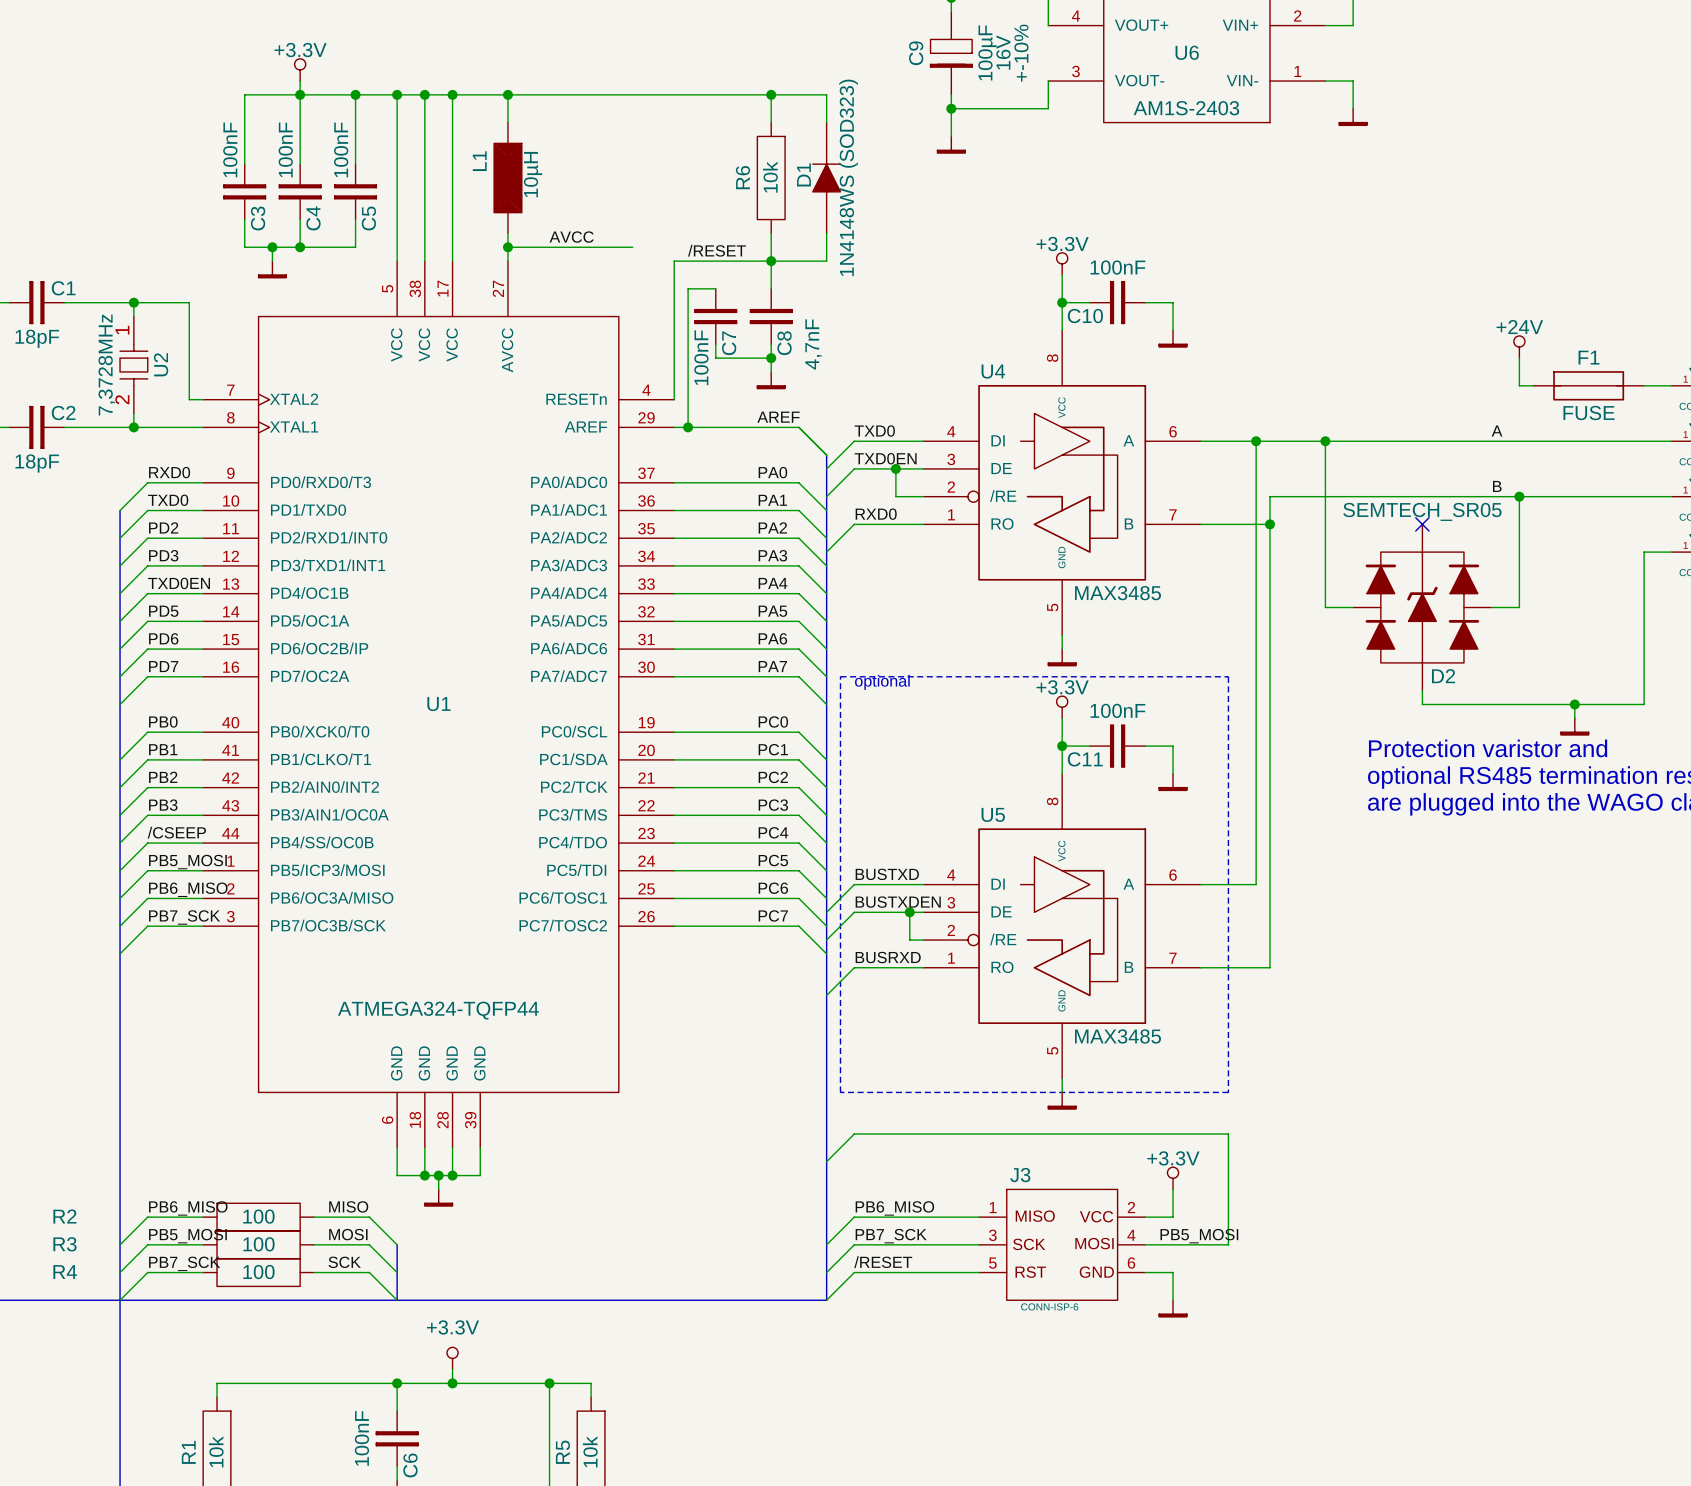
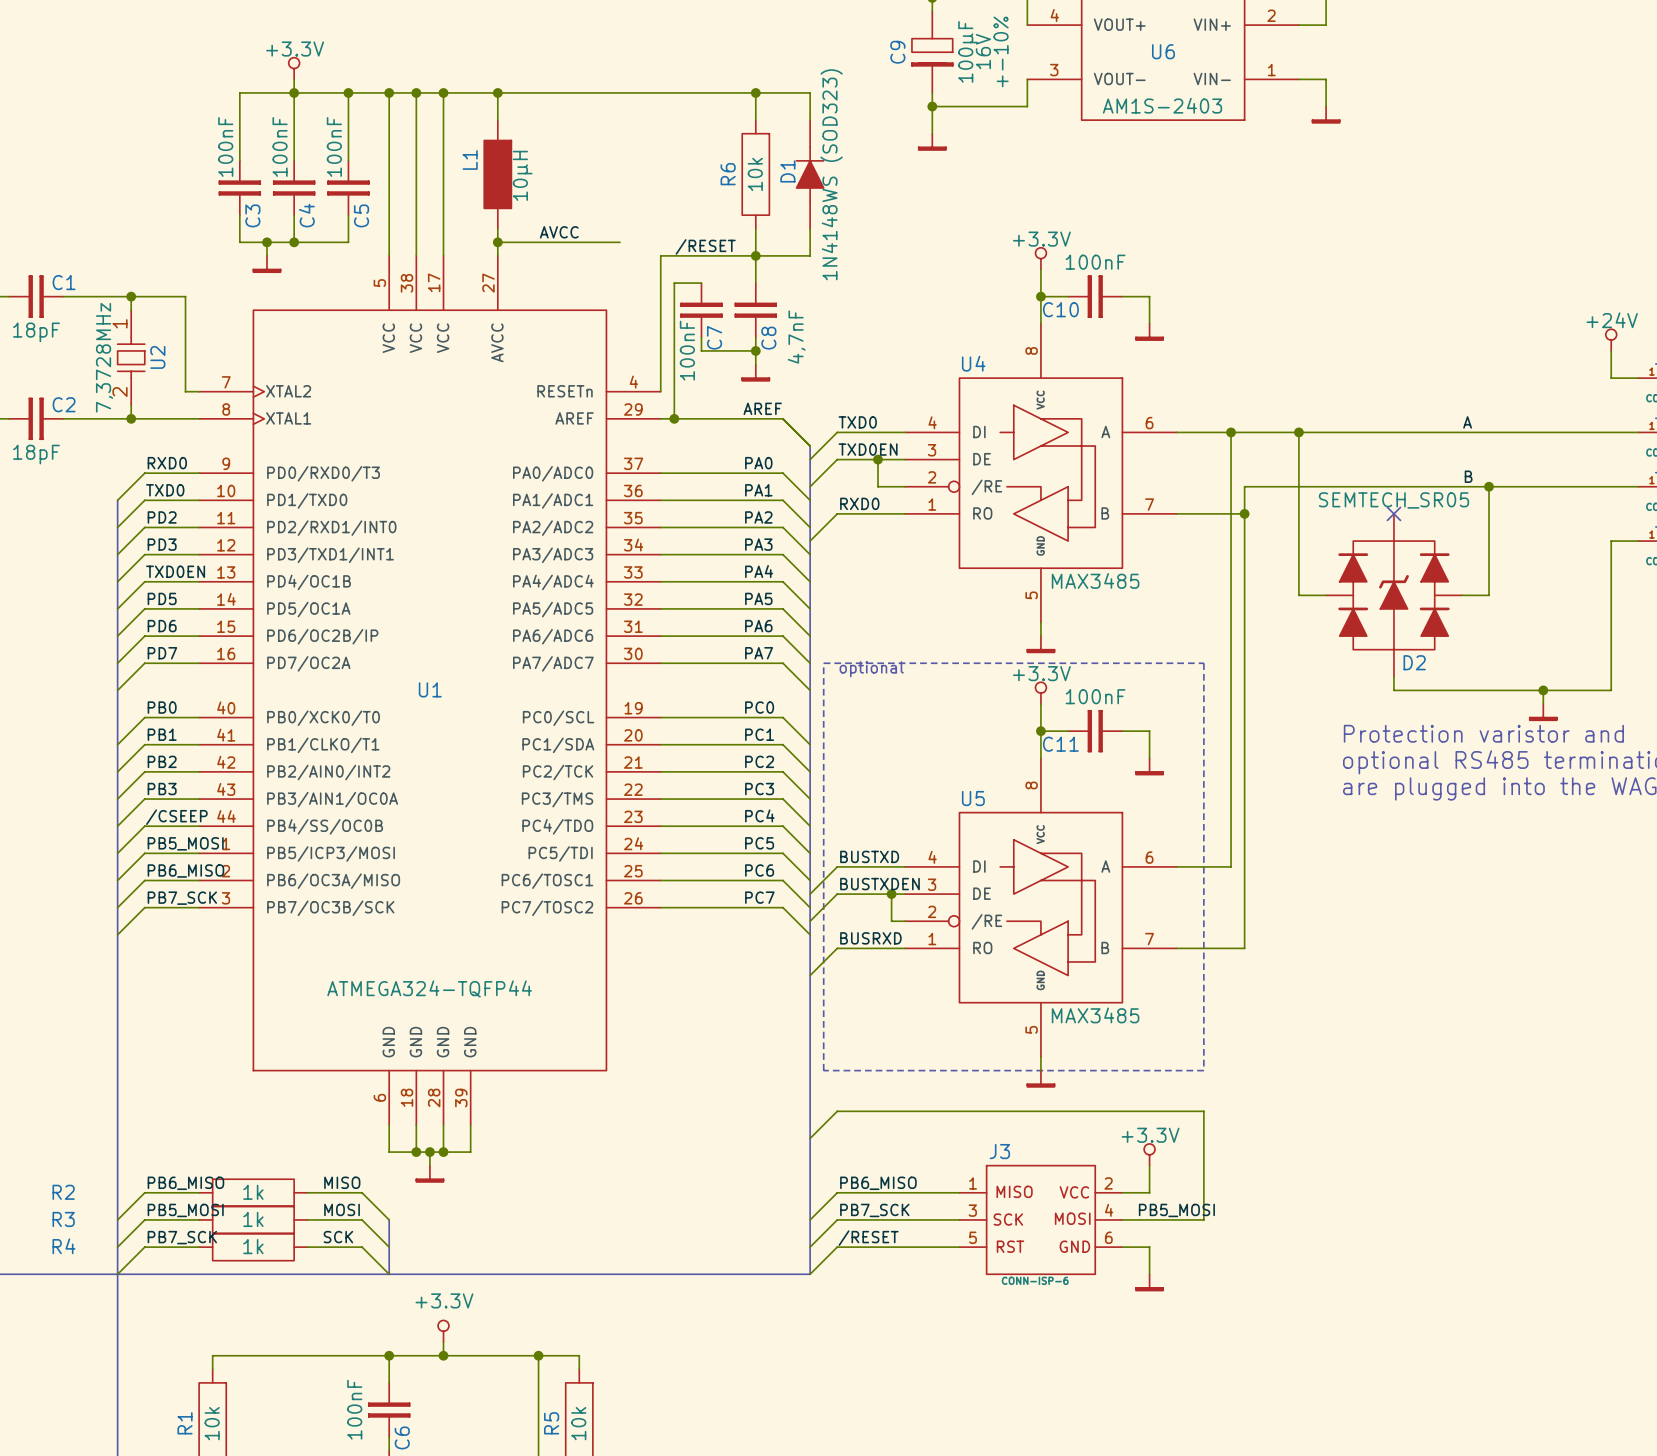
power symbol position: +24V (1519, 347) -> +24V (1611, 340)
wire: (1519, 358) (1519, 385) (1533, 385) -> none
wire: none -> (1611, 350) (1611, 378)
F1: FUSE (1588, 385) -> none
R2 value: 100 (258, 1216) -> 1k (253, 1192)
R3 value: 100 (258, 1244) -> 1k (253, 1219)
R4 value: 100 (258, 1272) -> 1k (253, 1246)

